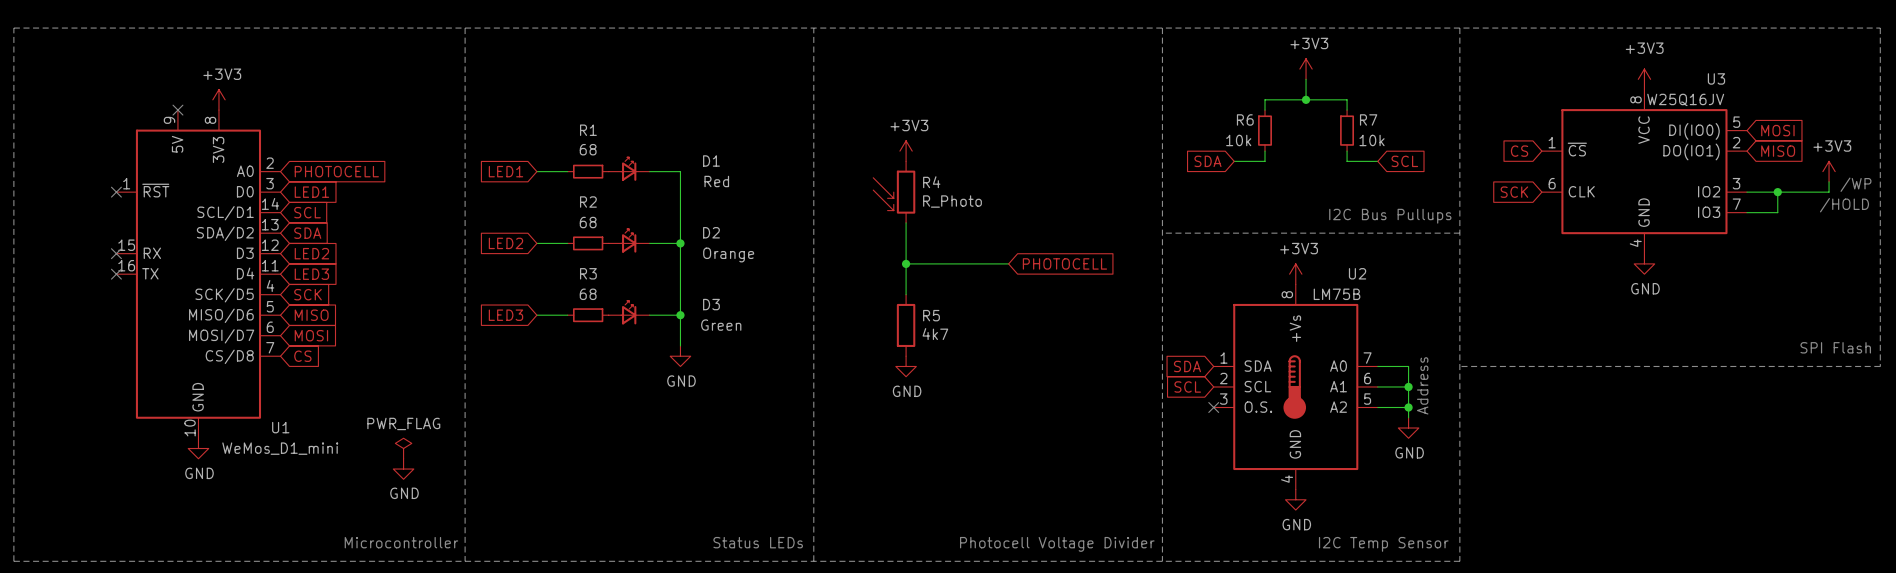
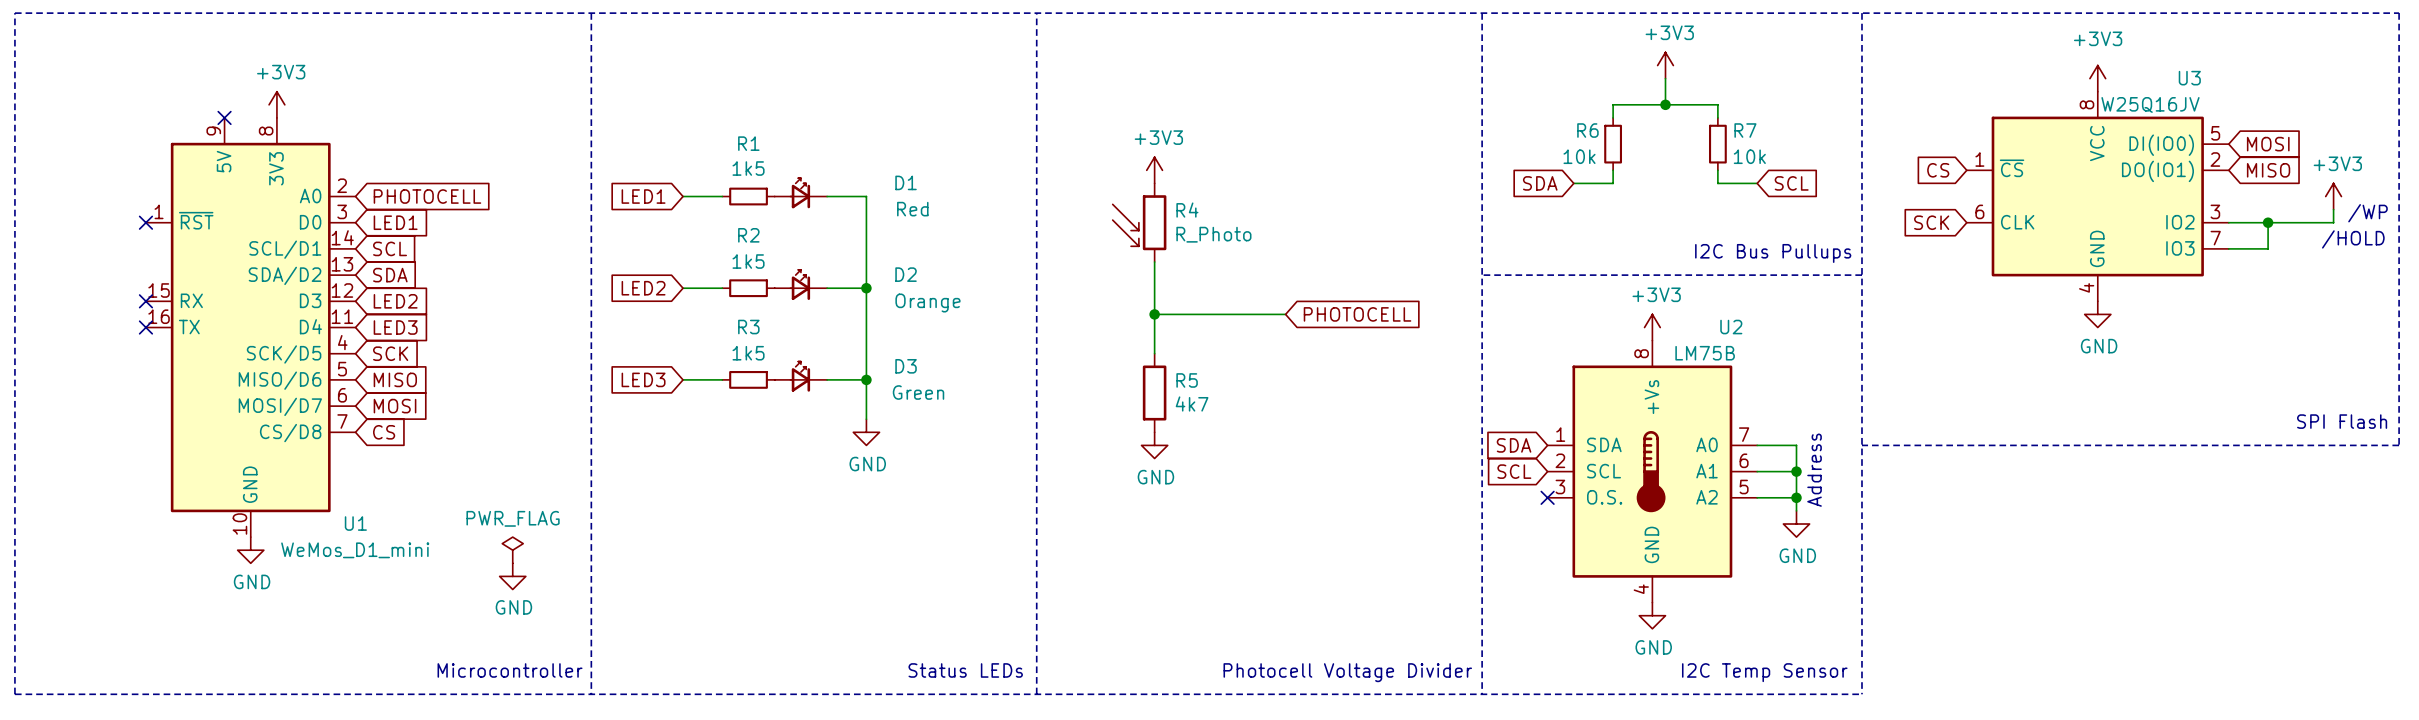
R1 value: 68 (588, 149) -> 1k5 (748, 168)
R2 value: 68 (588, 222) -> 1k5 (748, 261)
R3 value: 68 (588, 294) -> 1k5 (748, 353)

